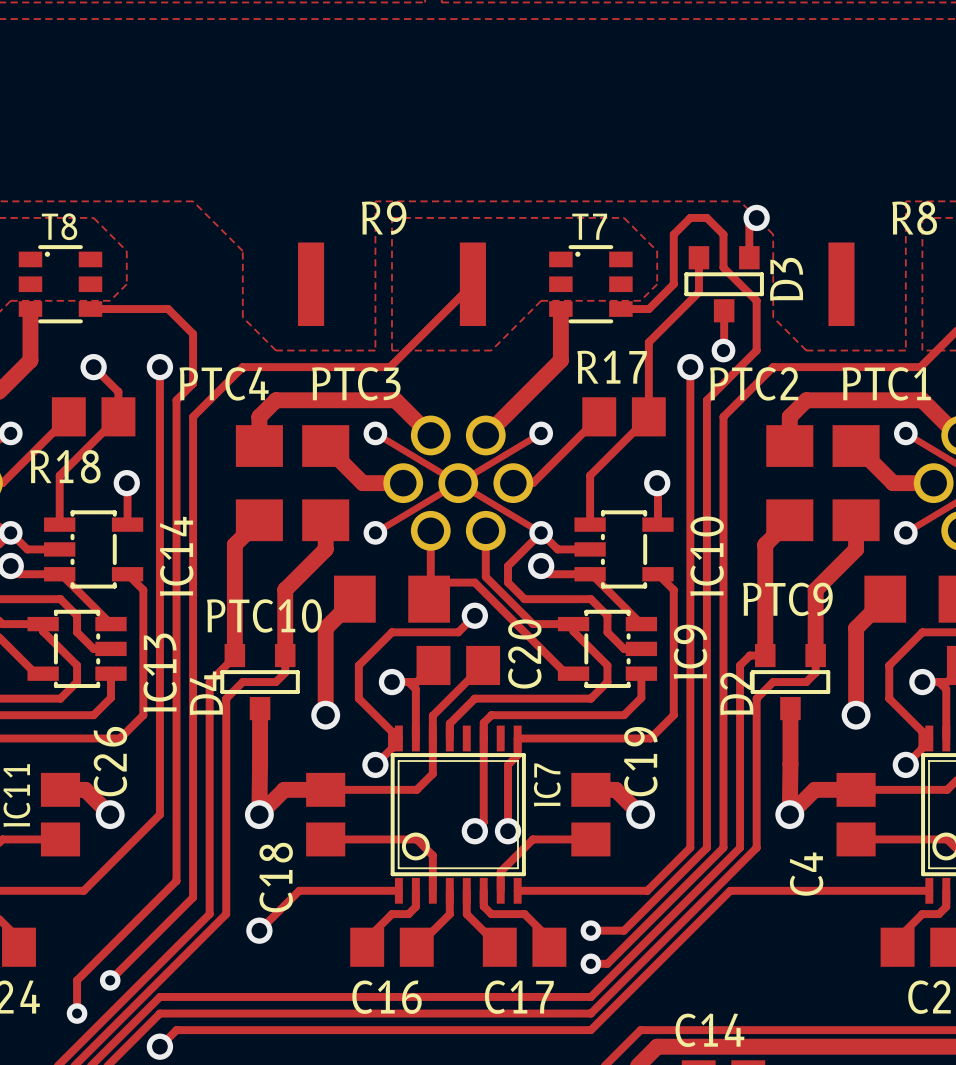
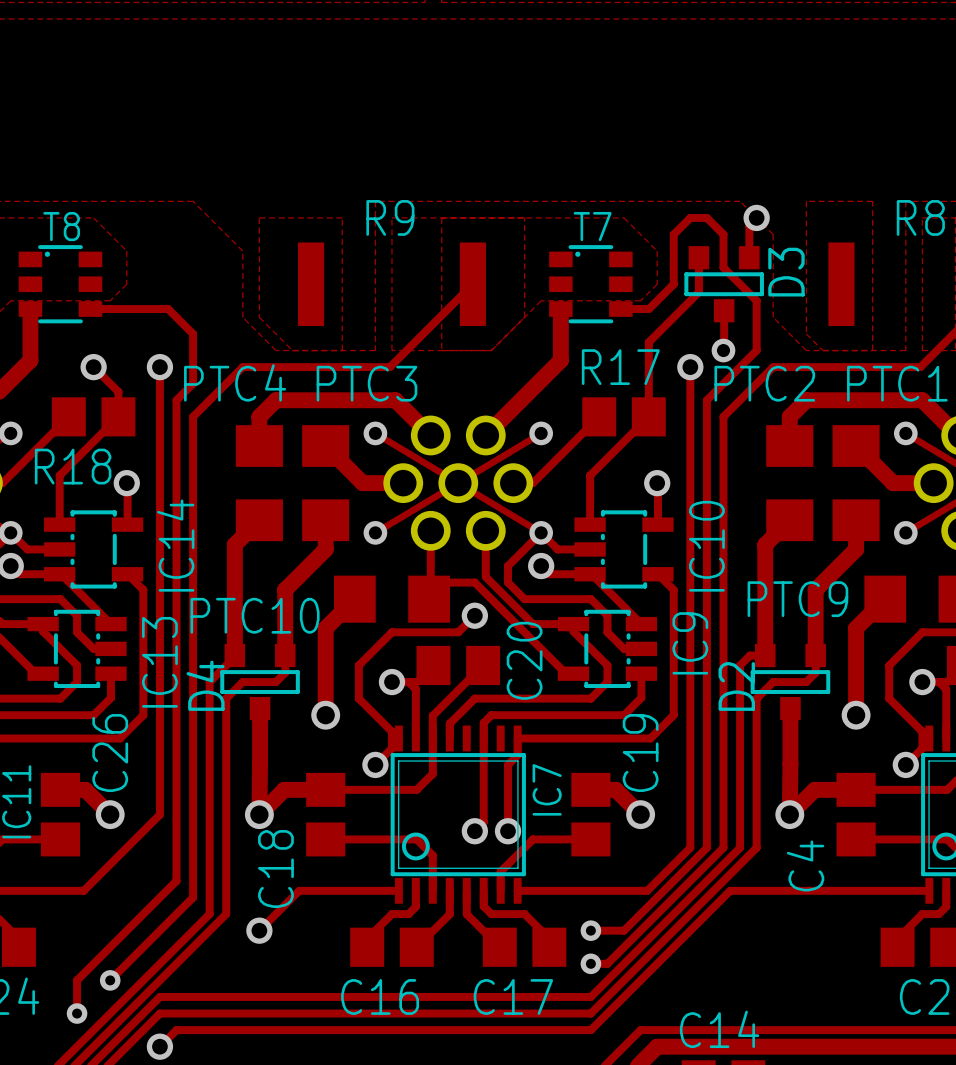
zone outline: none -> (441, 217) (441, 350)
zone outline: none -> (524, 217) (524, 317)
zone outline: none -> (955, 217) (955, 350)
zone outline: none -> (292, 350) (259, 317) (259, 217) (342, 217) (342, 350)
zone outline: none -> (822, 350) (806, 333) (806, 201) (872, 201) (872, 350)

